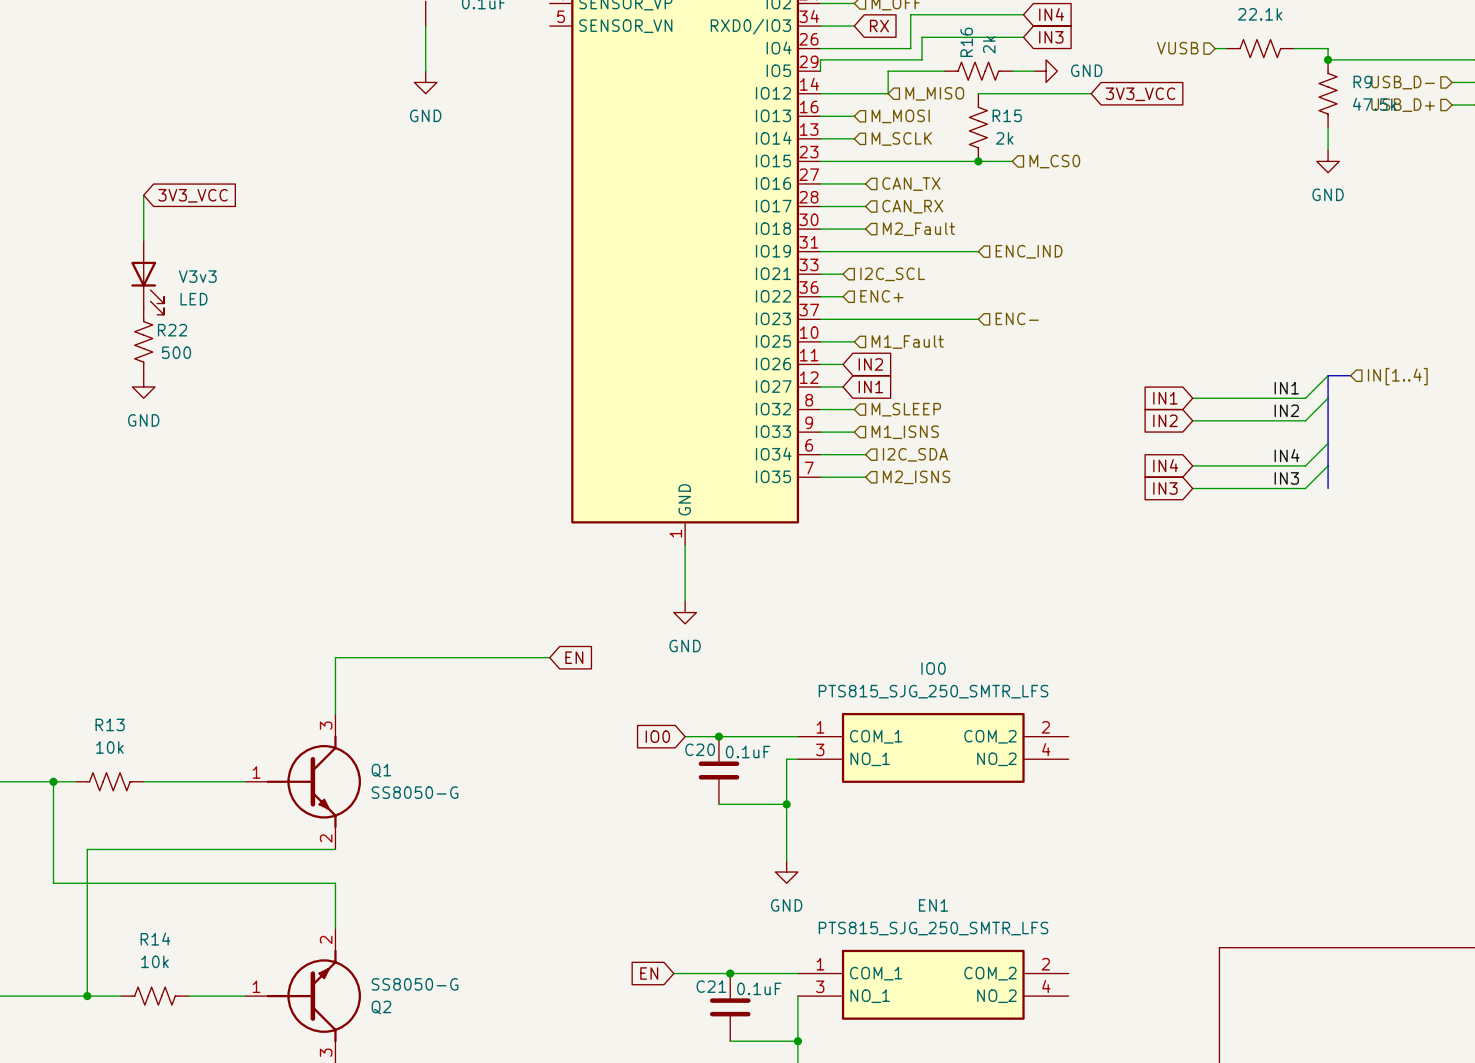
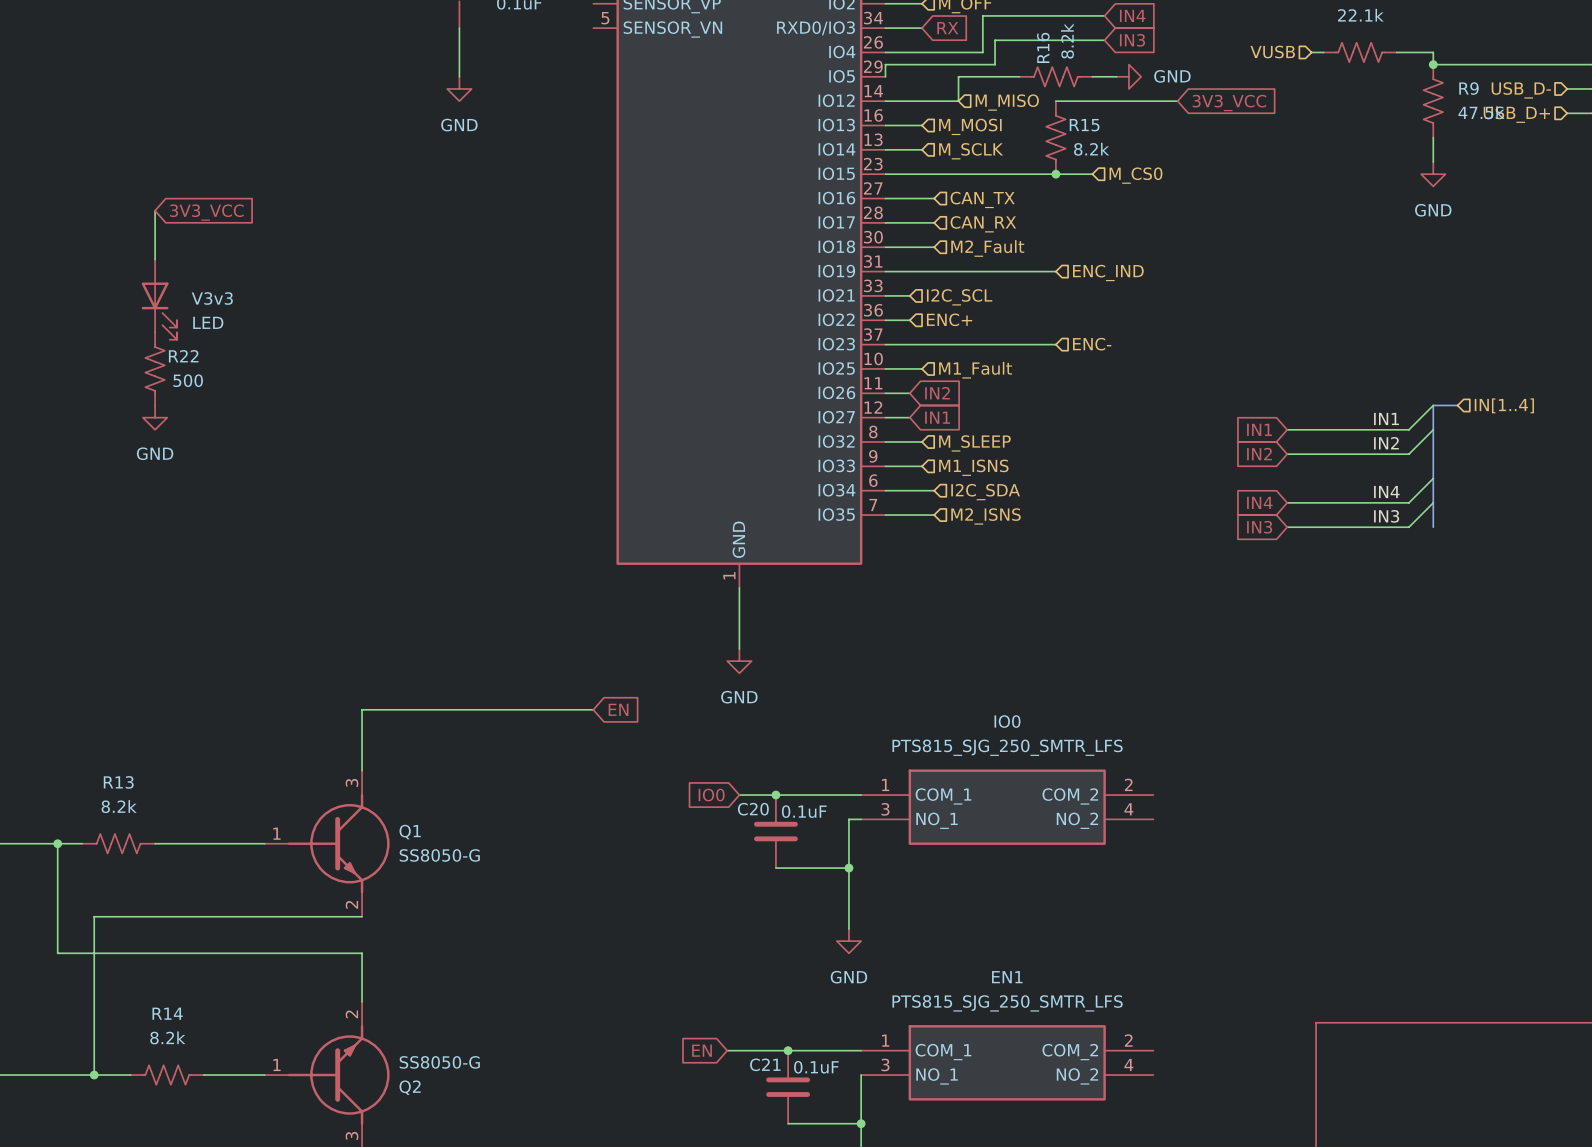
R16 value: 2k (989, 44) -> 8.2k (1067, 41)
R15 value: 2k (1004, 138) -> 8.2k (1091, 149)
R13 value: 10k (109, 747) -> 8.2k (119, 806)
R14 value: 10k (154, 961) -> 8.2k (167, 1037)

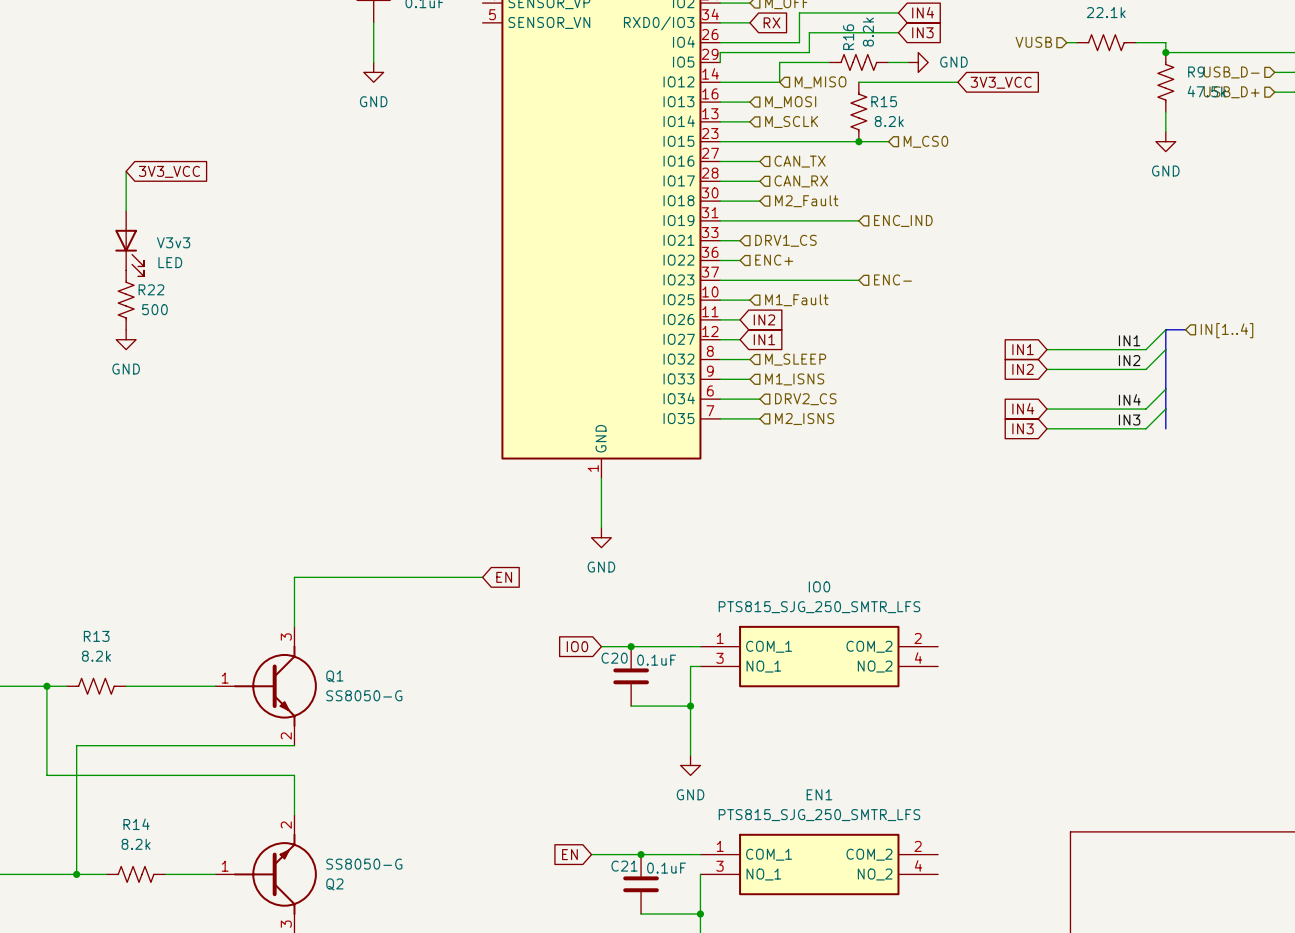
hierarchical label: I2C_SCL (959, 297) -> DRV1_CS (785, 240)
hierarchical label: I2C_SDA (985, 492) -> DRV2_CS (805, 399)

